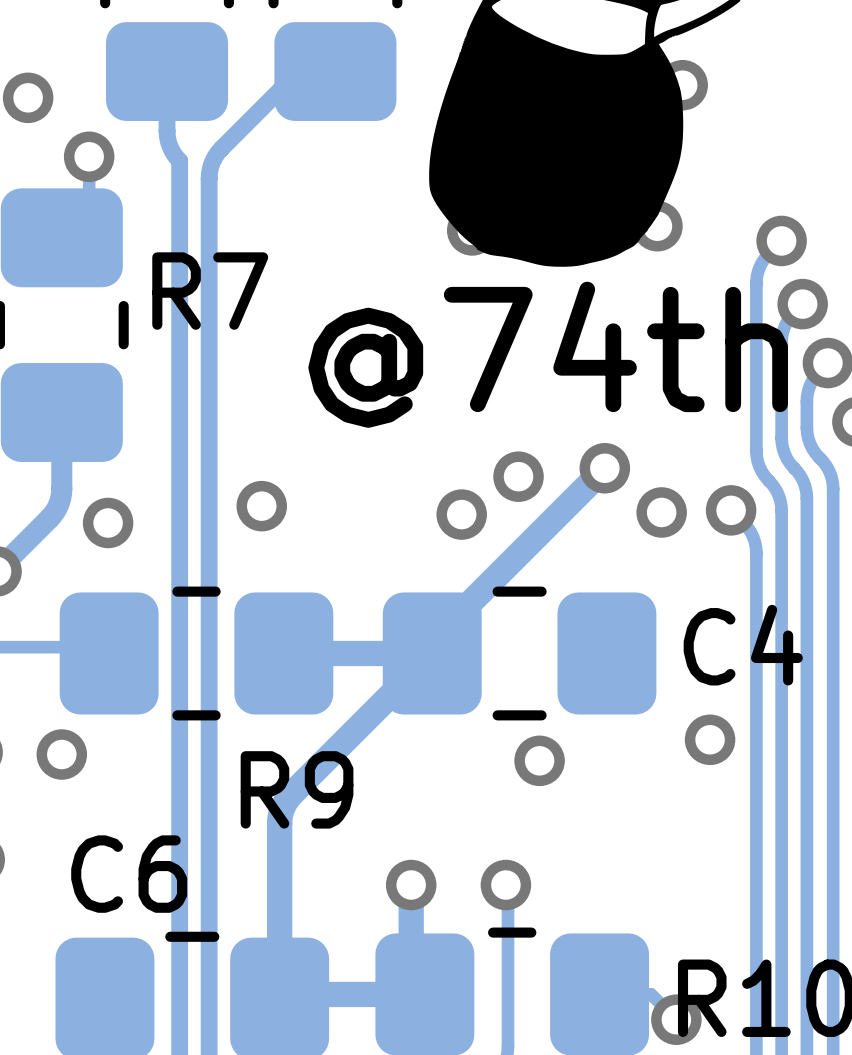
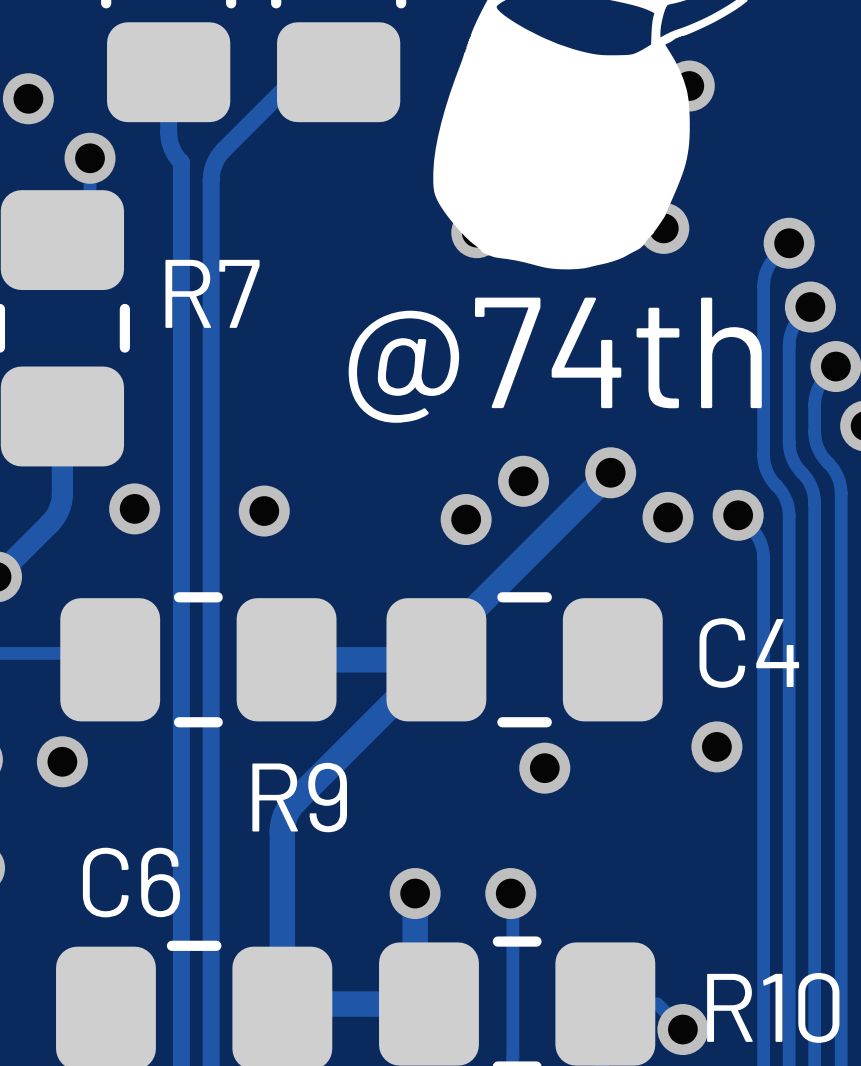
via position: (108, 522) -> (134, 508)

